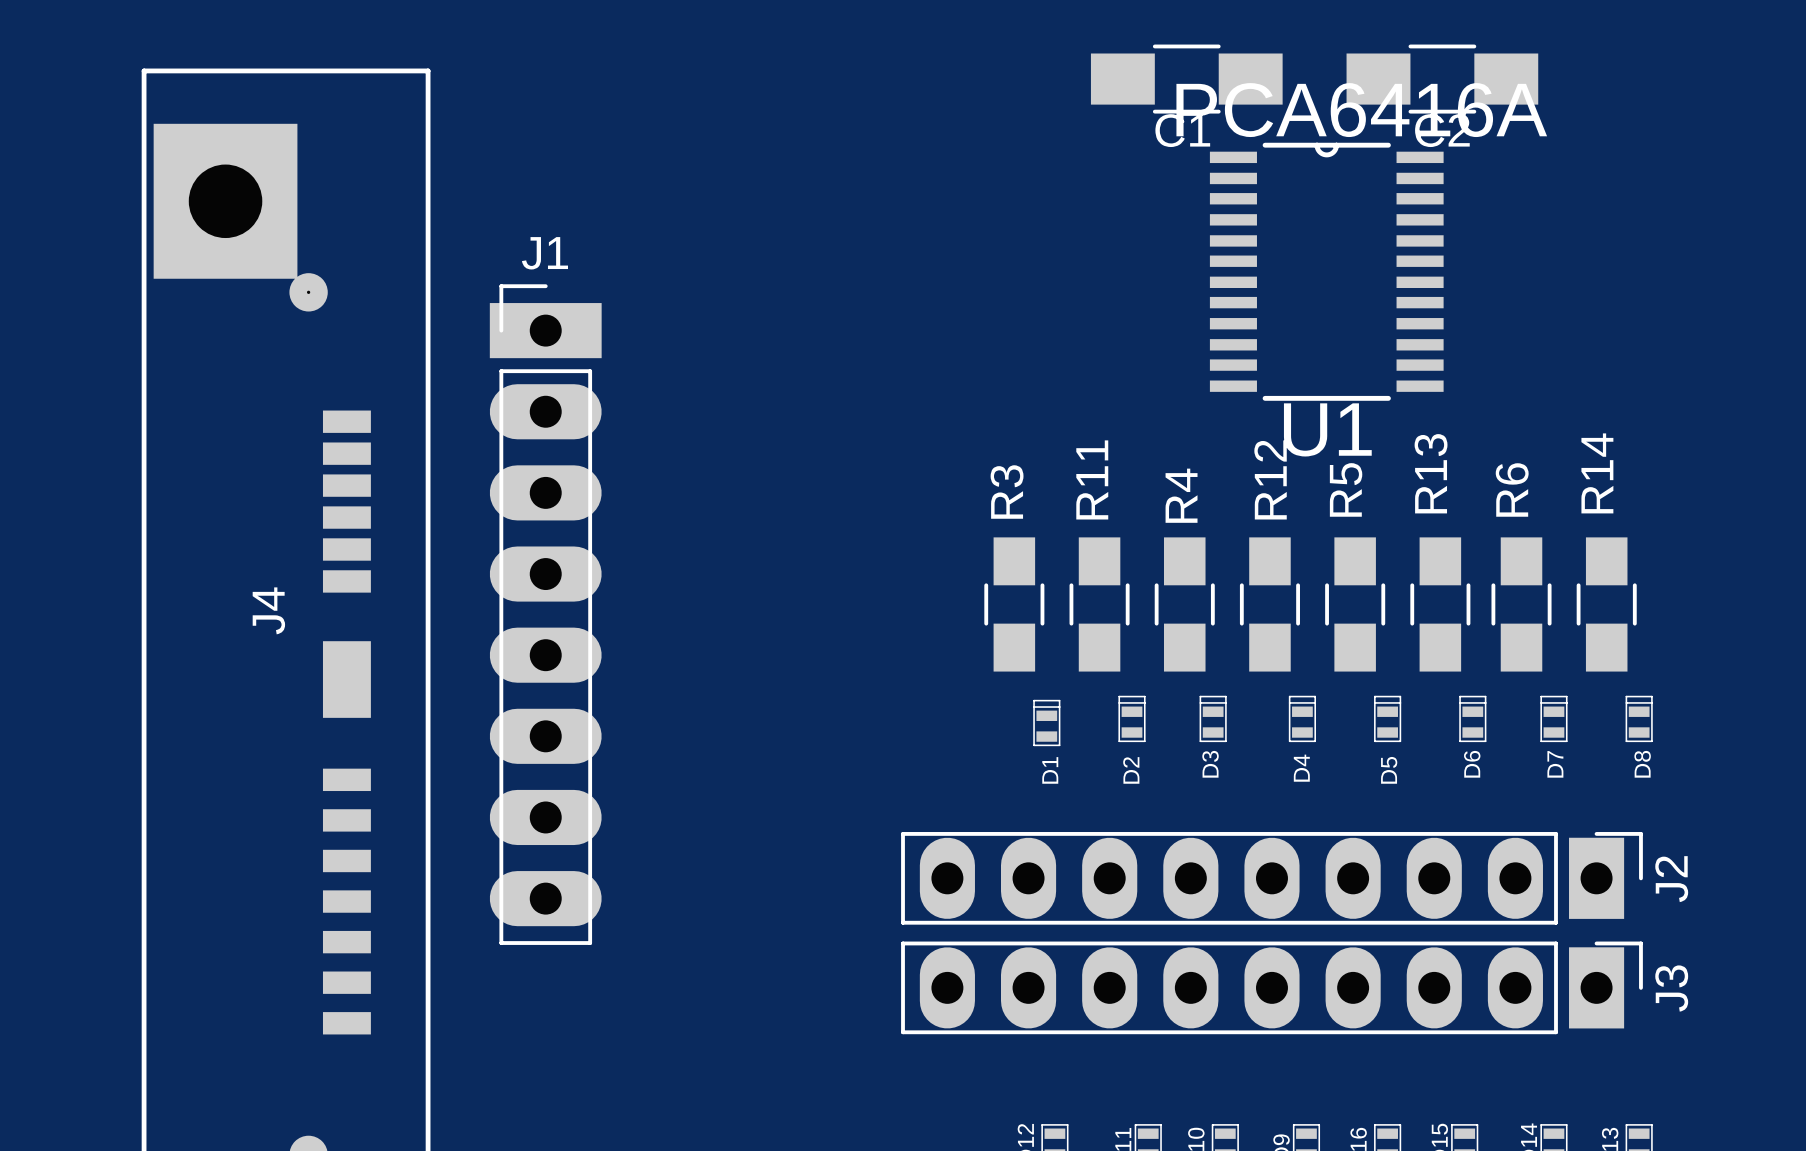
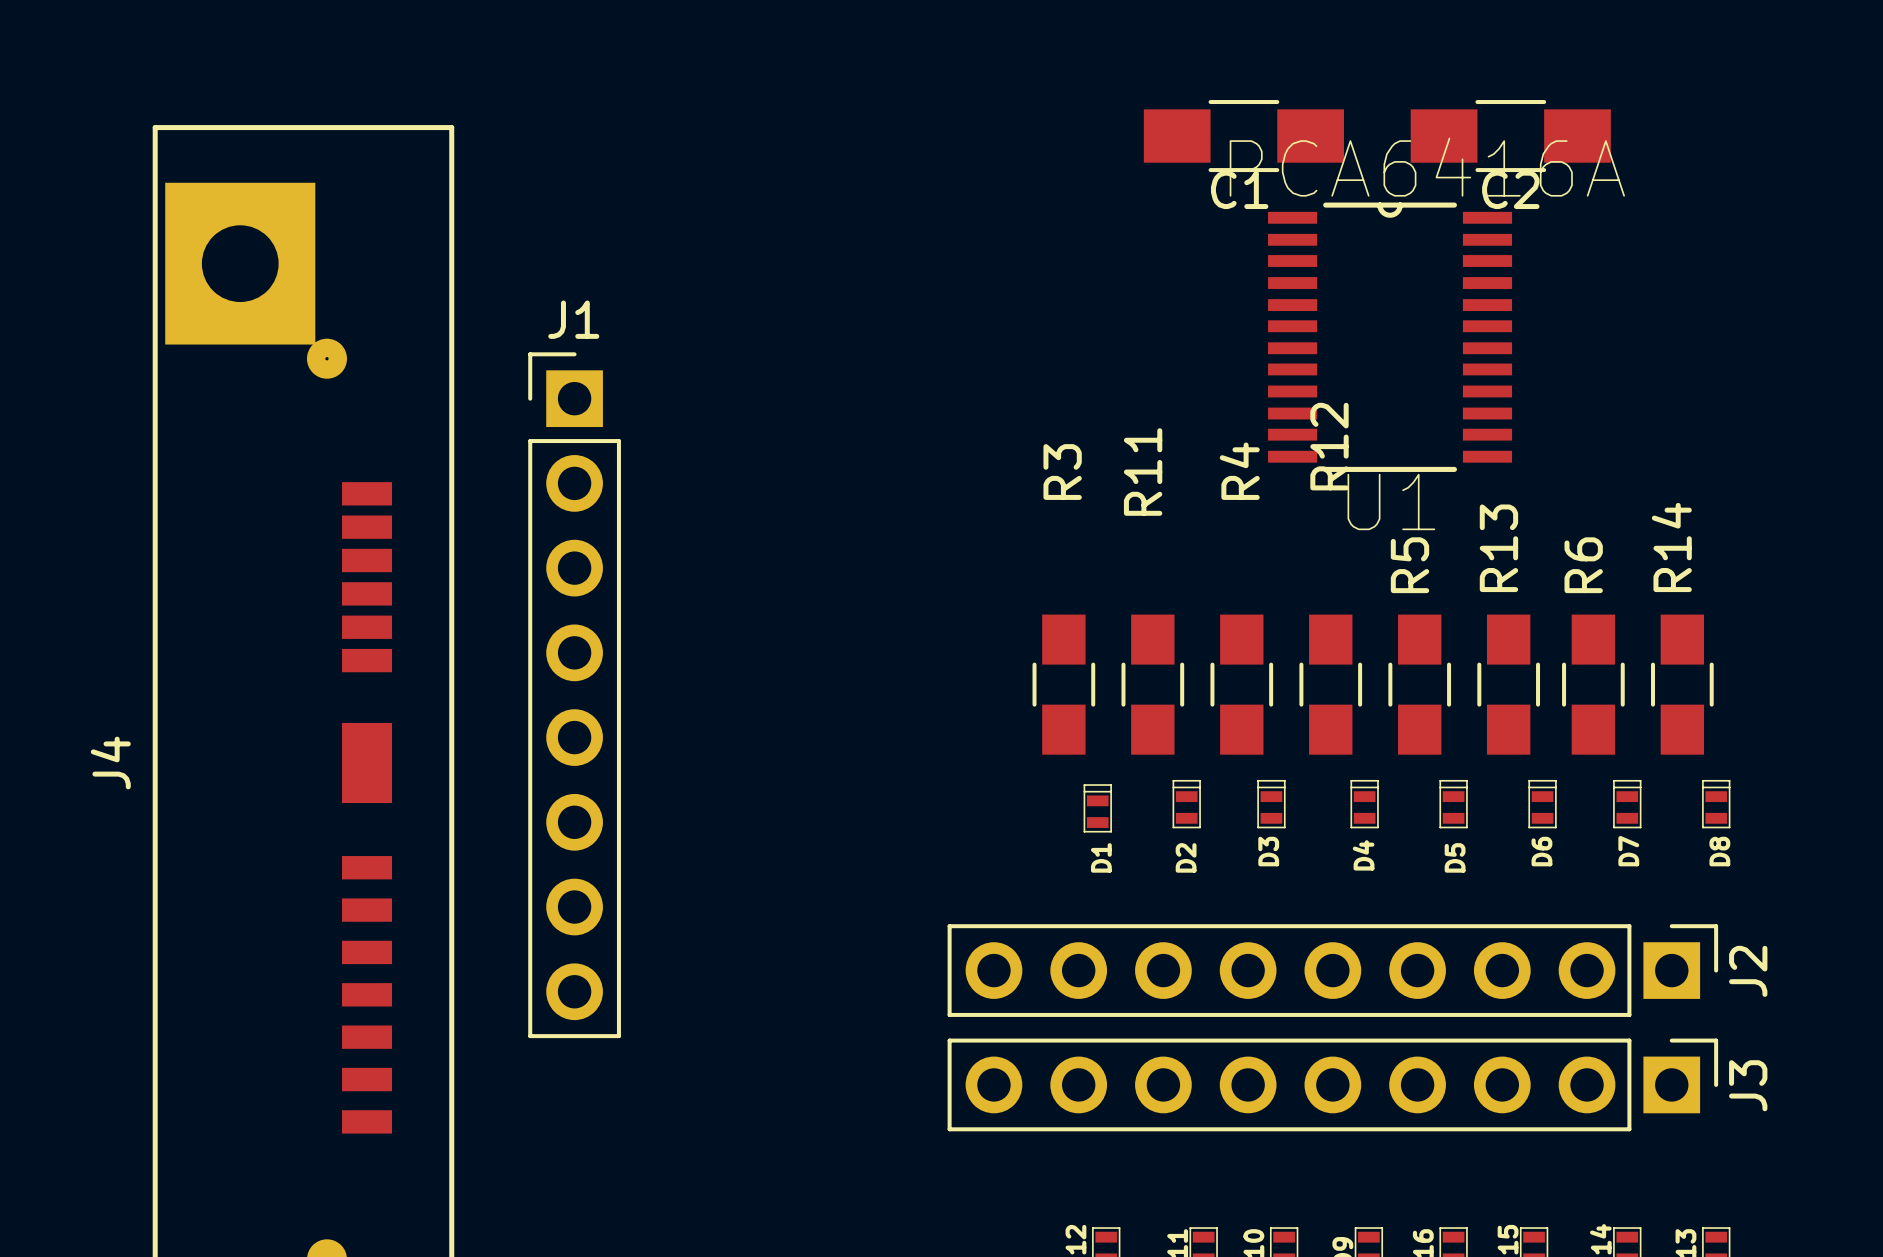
J1 footprint: [489, 284, 602, 945] -> [528, 352, 621, 1039]
R11 name position: R11 (1092, 479) -> R11 (1143, 472)
R12 name position: R12 (1270, 479) -> R12 (1329, 446)
R3 name position: R3 (1007, 492) -> R3 (1062, 472)
R4 name position: R4 (1181, 495) -> R4 (1239, 471)
J4 name position: J4 (268, 610) -> J4 (110, 762)
J2 footprint: [901, 832, 1643, 925] -> [947, 924, 1719, 1017]
J3 footprint: [901, 941, 1643, 1035] -> [947, 1038, 1719, 1132]

